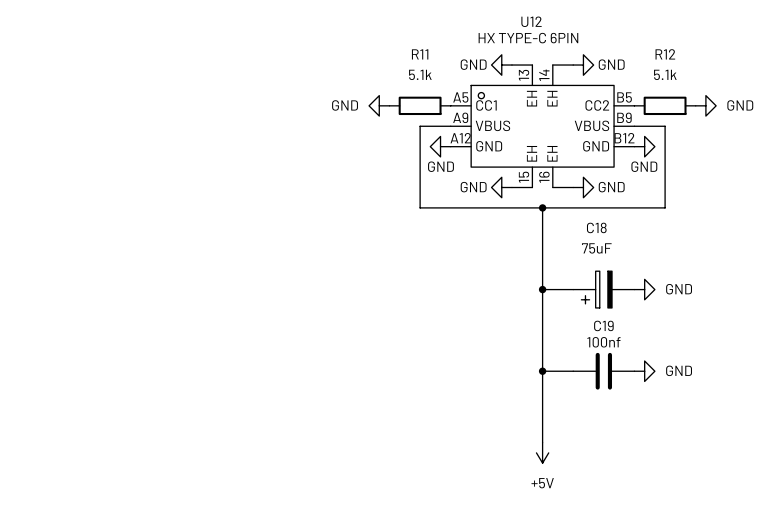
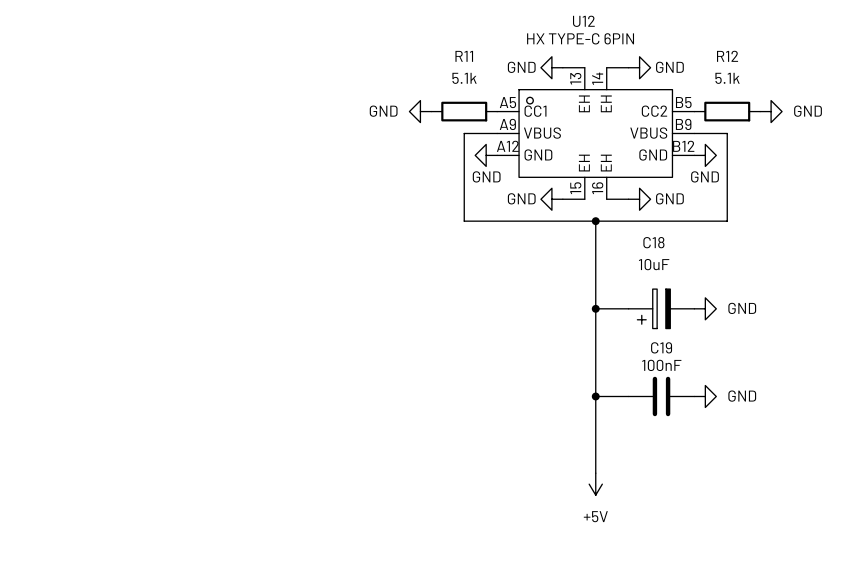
C18 value: 75uF (596, 248) -> 10uF (654, 264)
C19 value: 100nf (603, 342) -> 100nF (661, 365)

